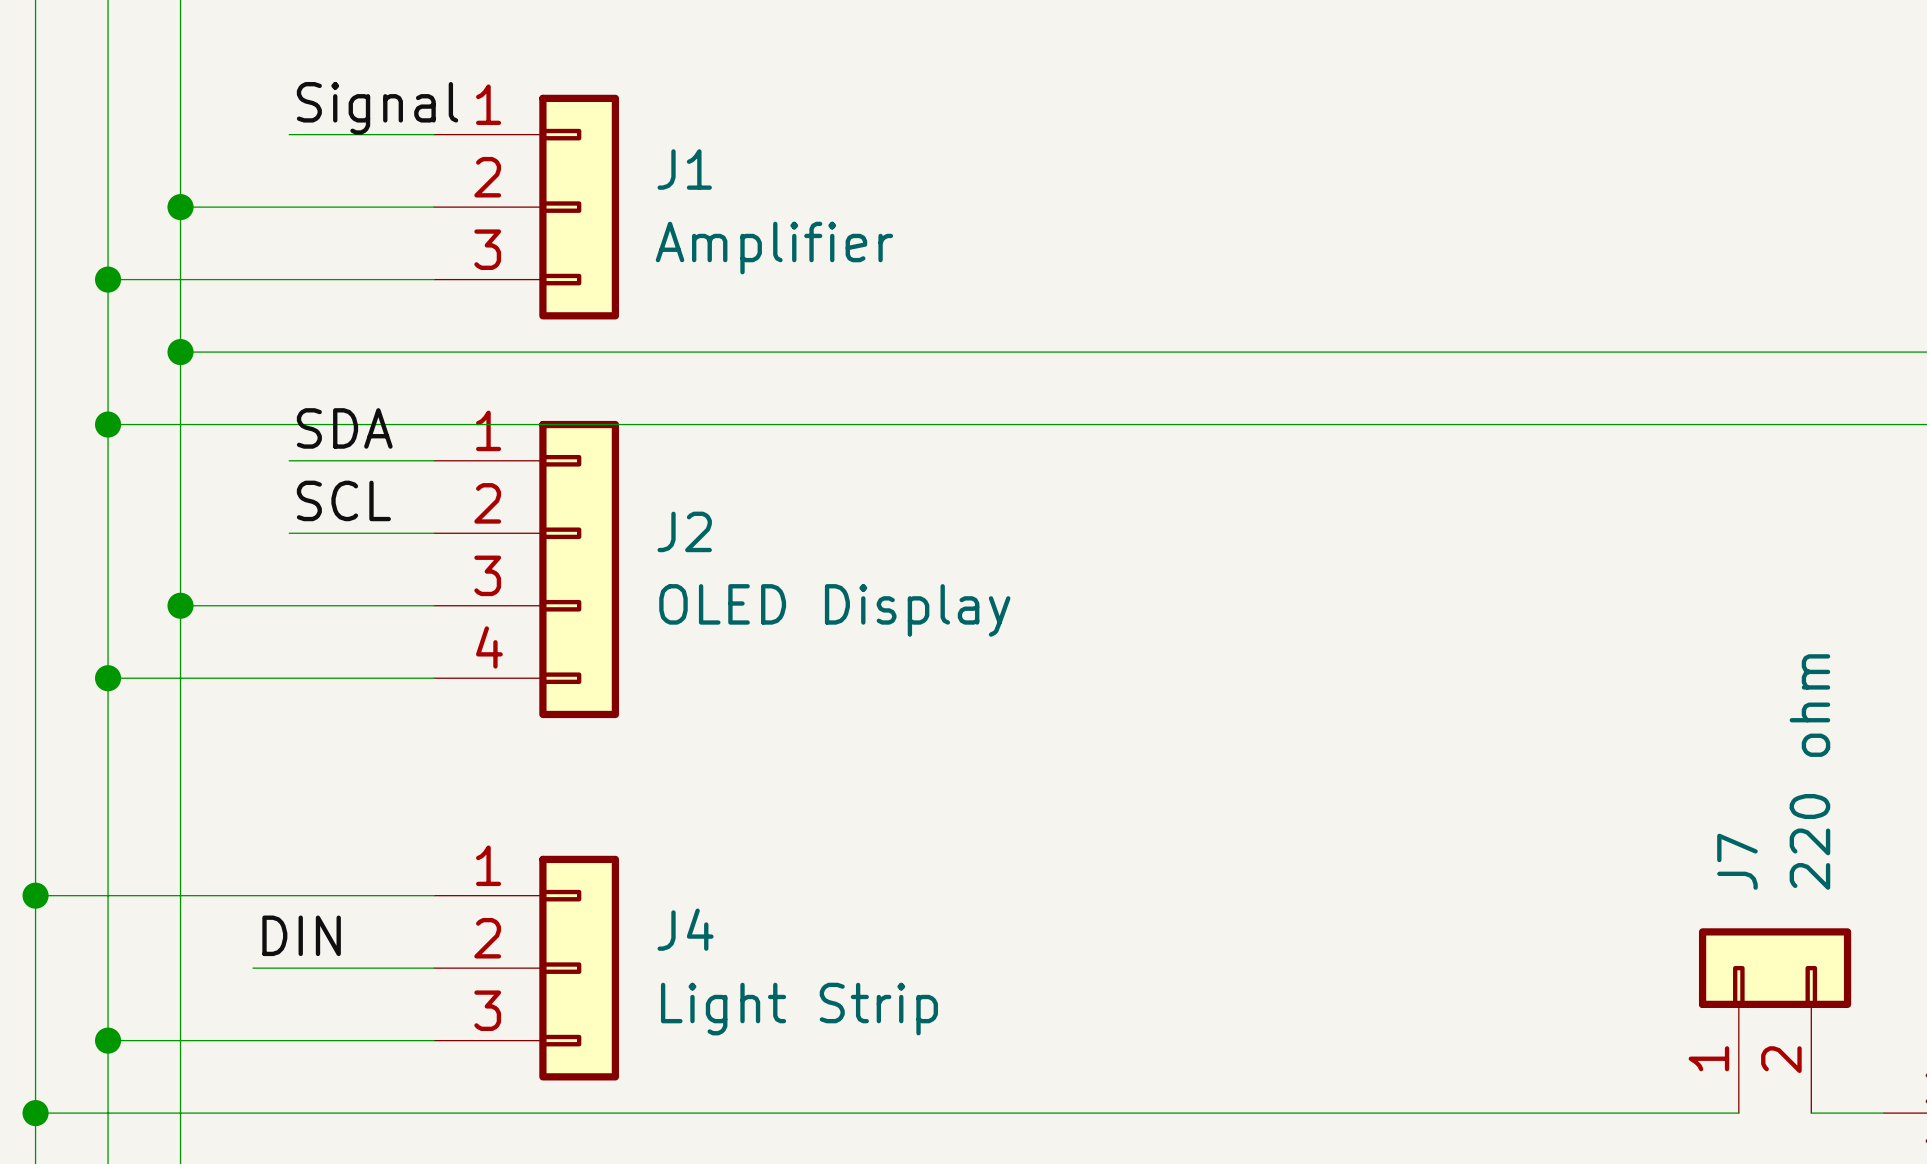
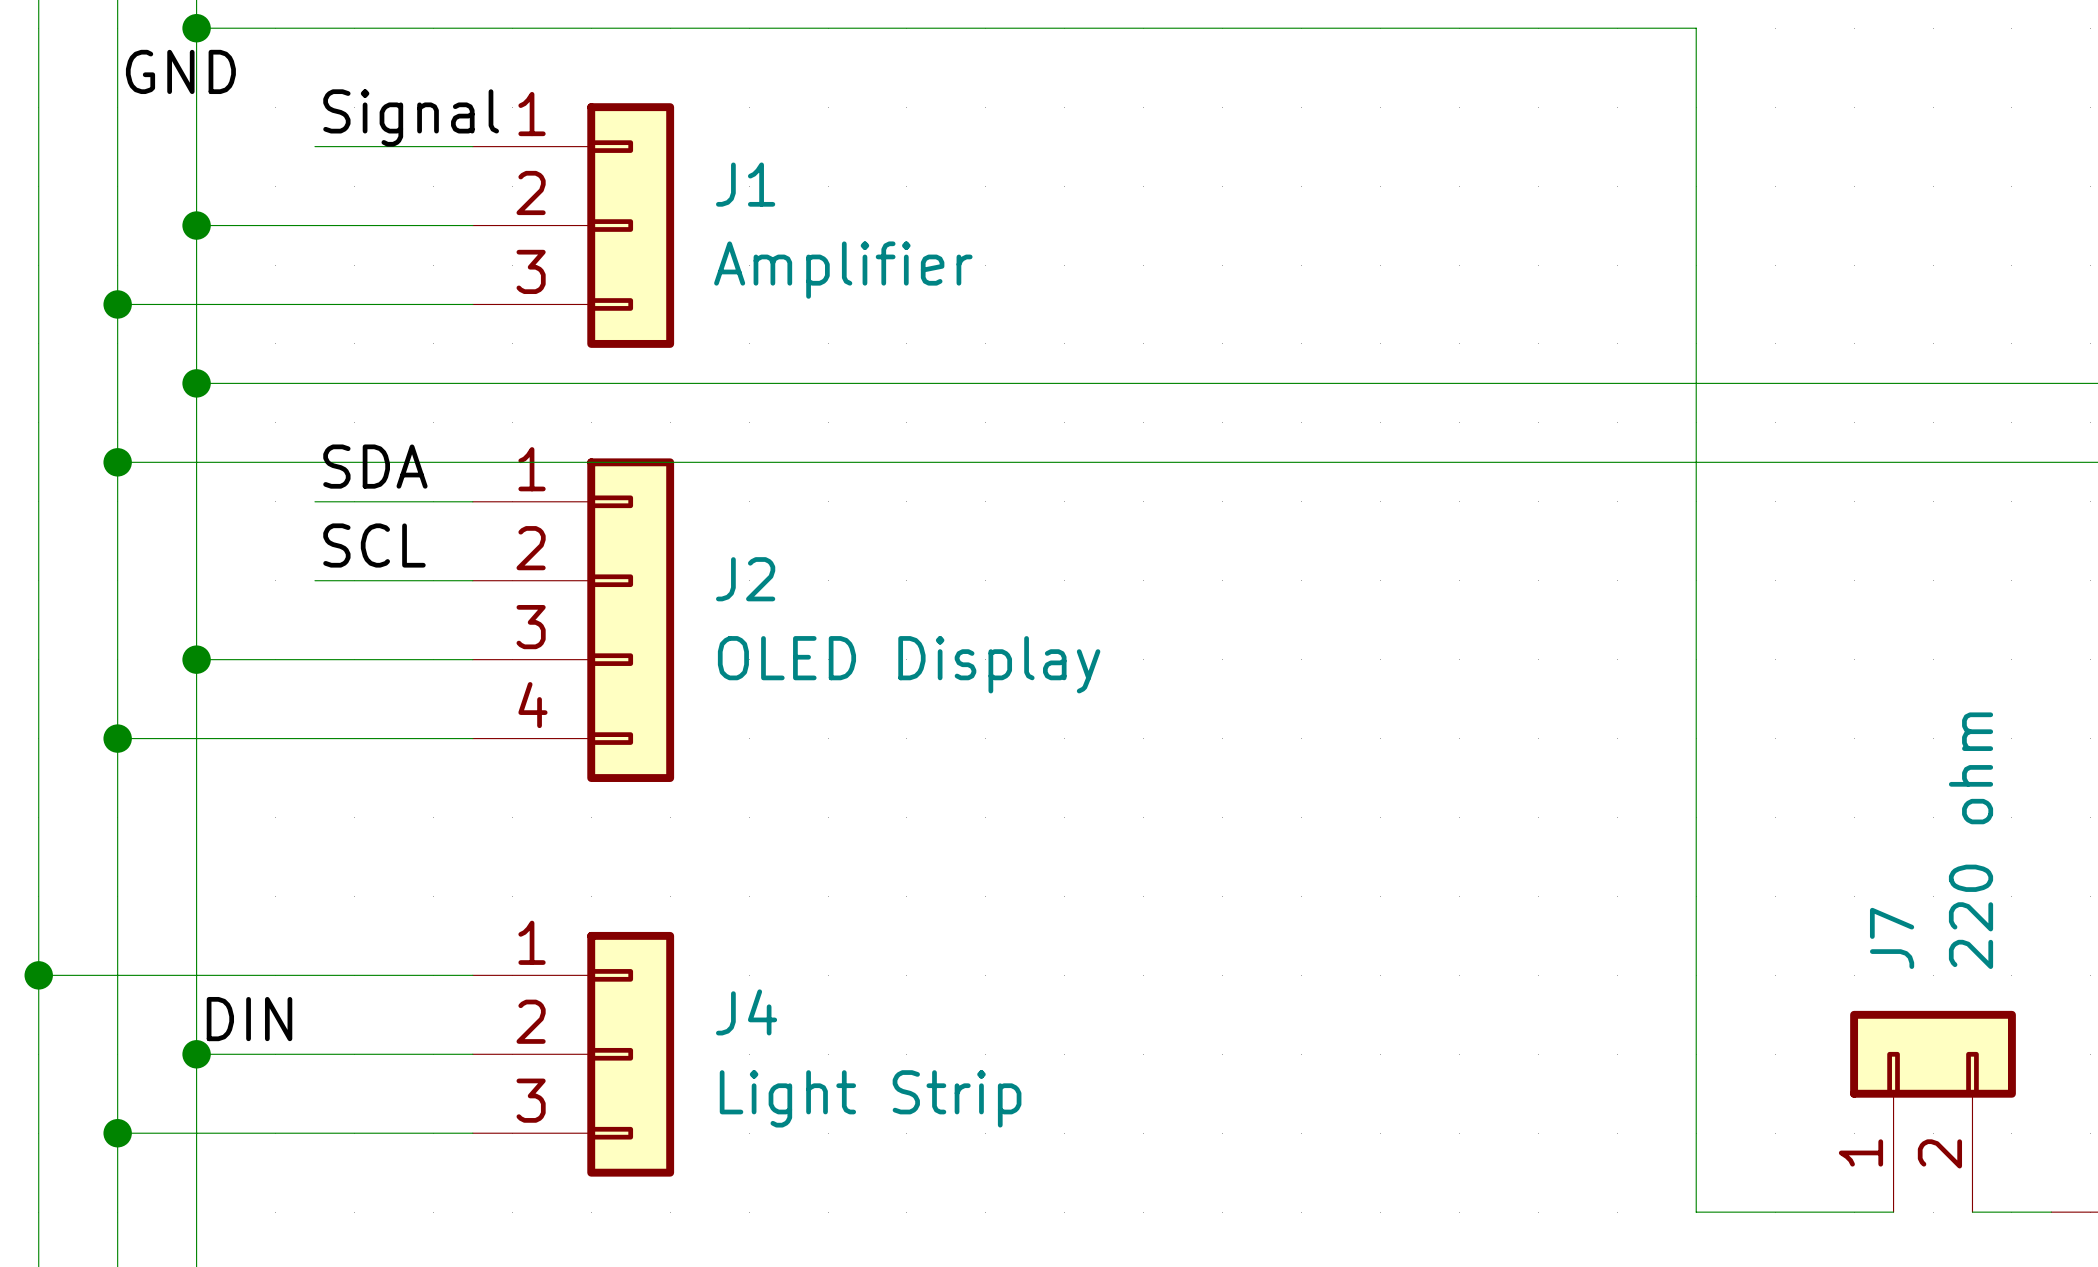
junction: none -> (196, 28)
label: none -> GND (180, 71)
label position: DIN (301, 935) -> DIN (249, 1019)
wire: none -> (196, 1054) (275, 1054)
junction: none -> (196, 1054)
wire: (35, 1113) (1557, 1113) -> (196, 28) (1696, 28) (1696, 1212)
junction: (35, 1113) -> none

